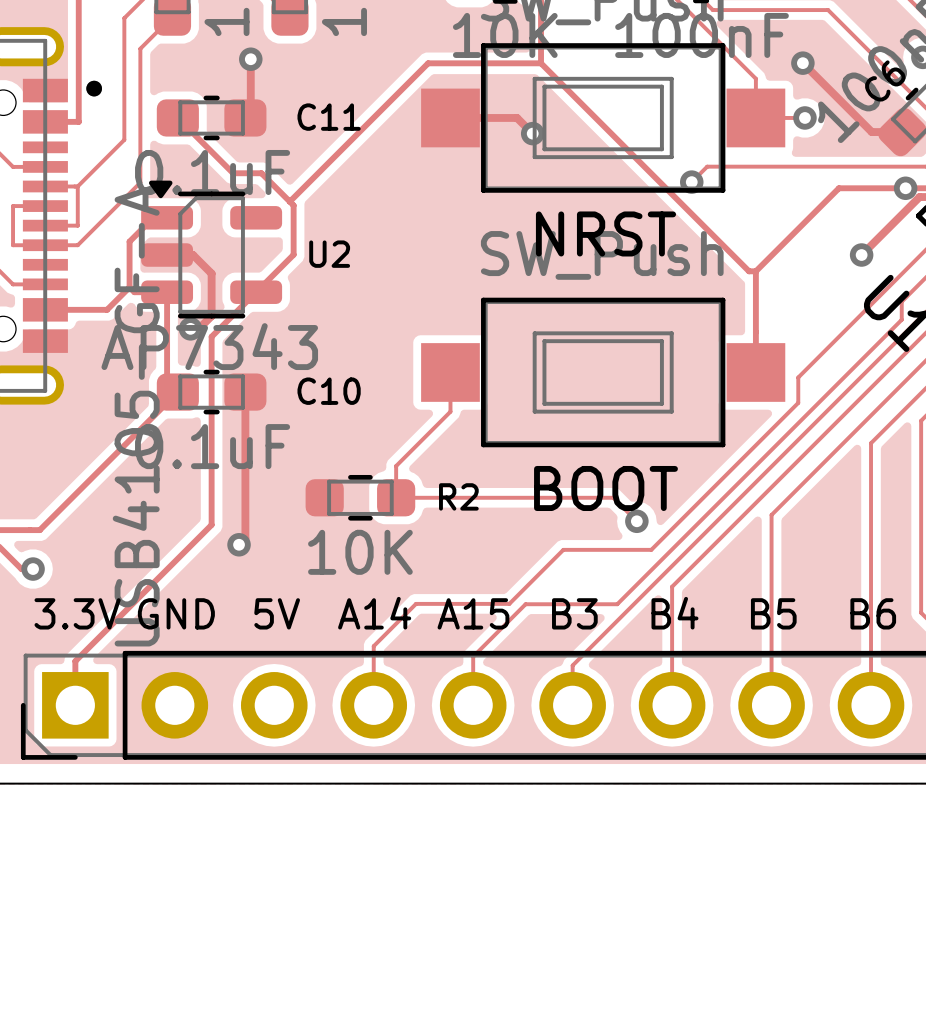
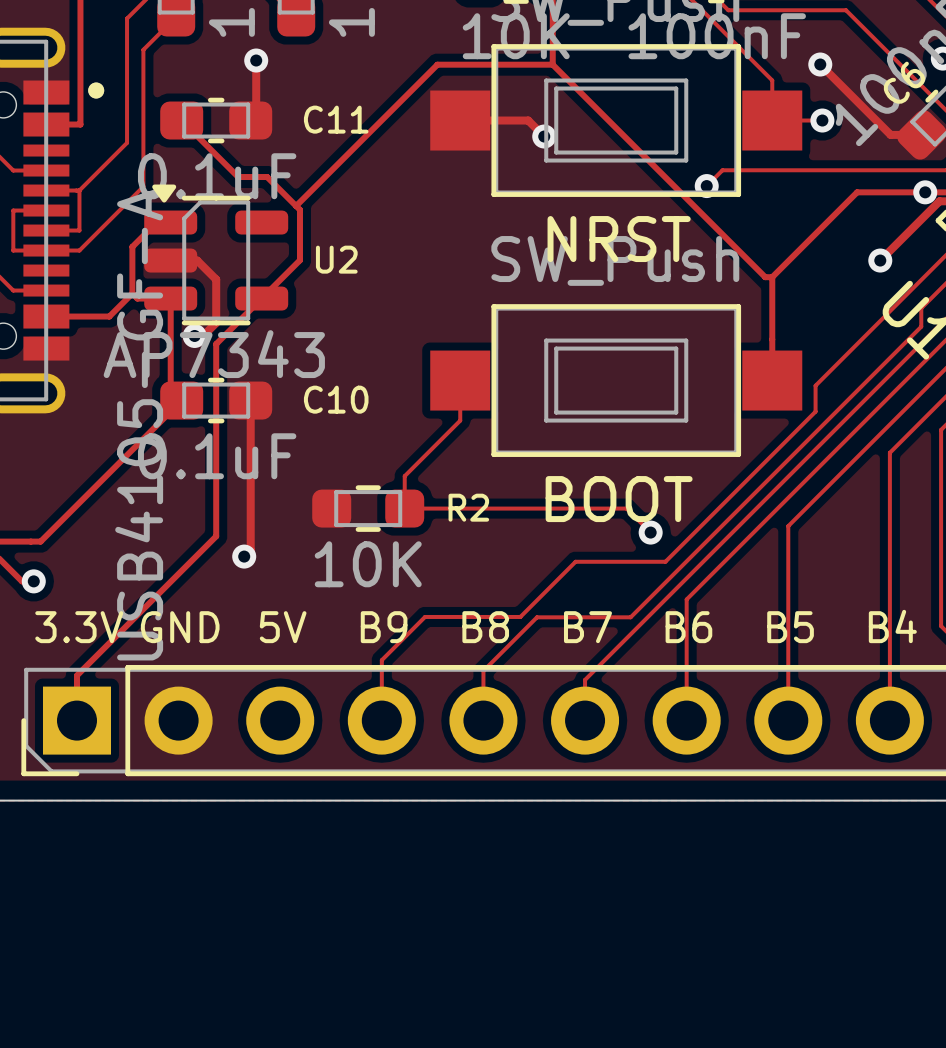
text: A14 (374, 613) -> B9 (384, 627)
text: A15 (473, 613) -> B8 (485, 627)
text: B3 (574, 613) -> B7 (587, 627)
text: B4 (674, 613) -> B6 (688, 627)
text: B6 (873, 613) -> B4 (892, 626)

